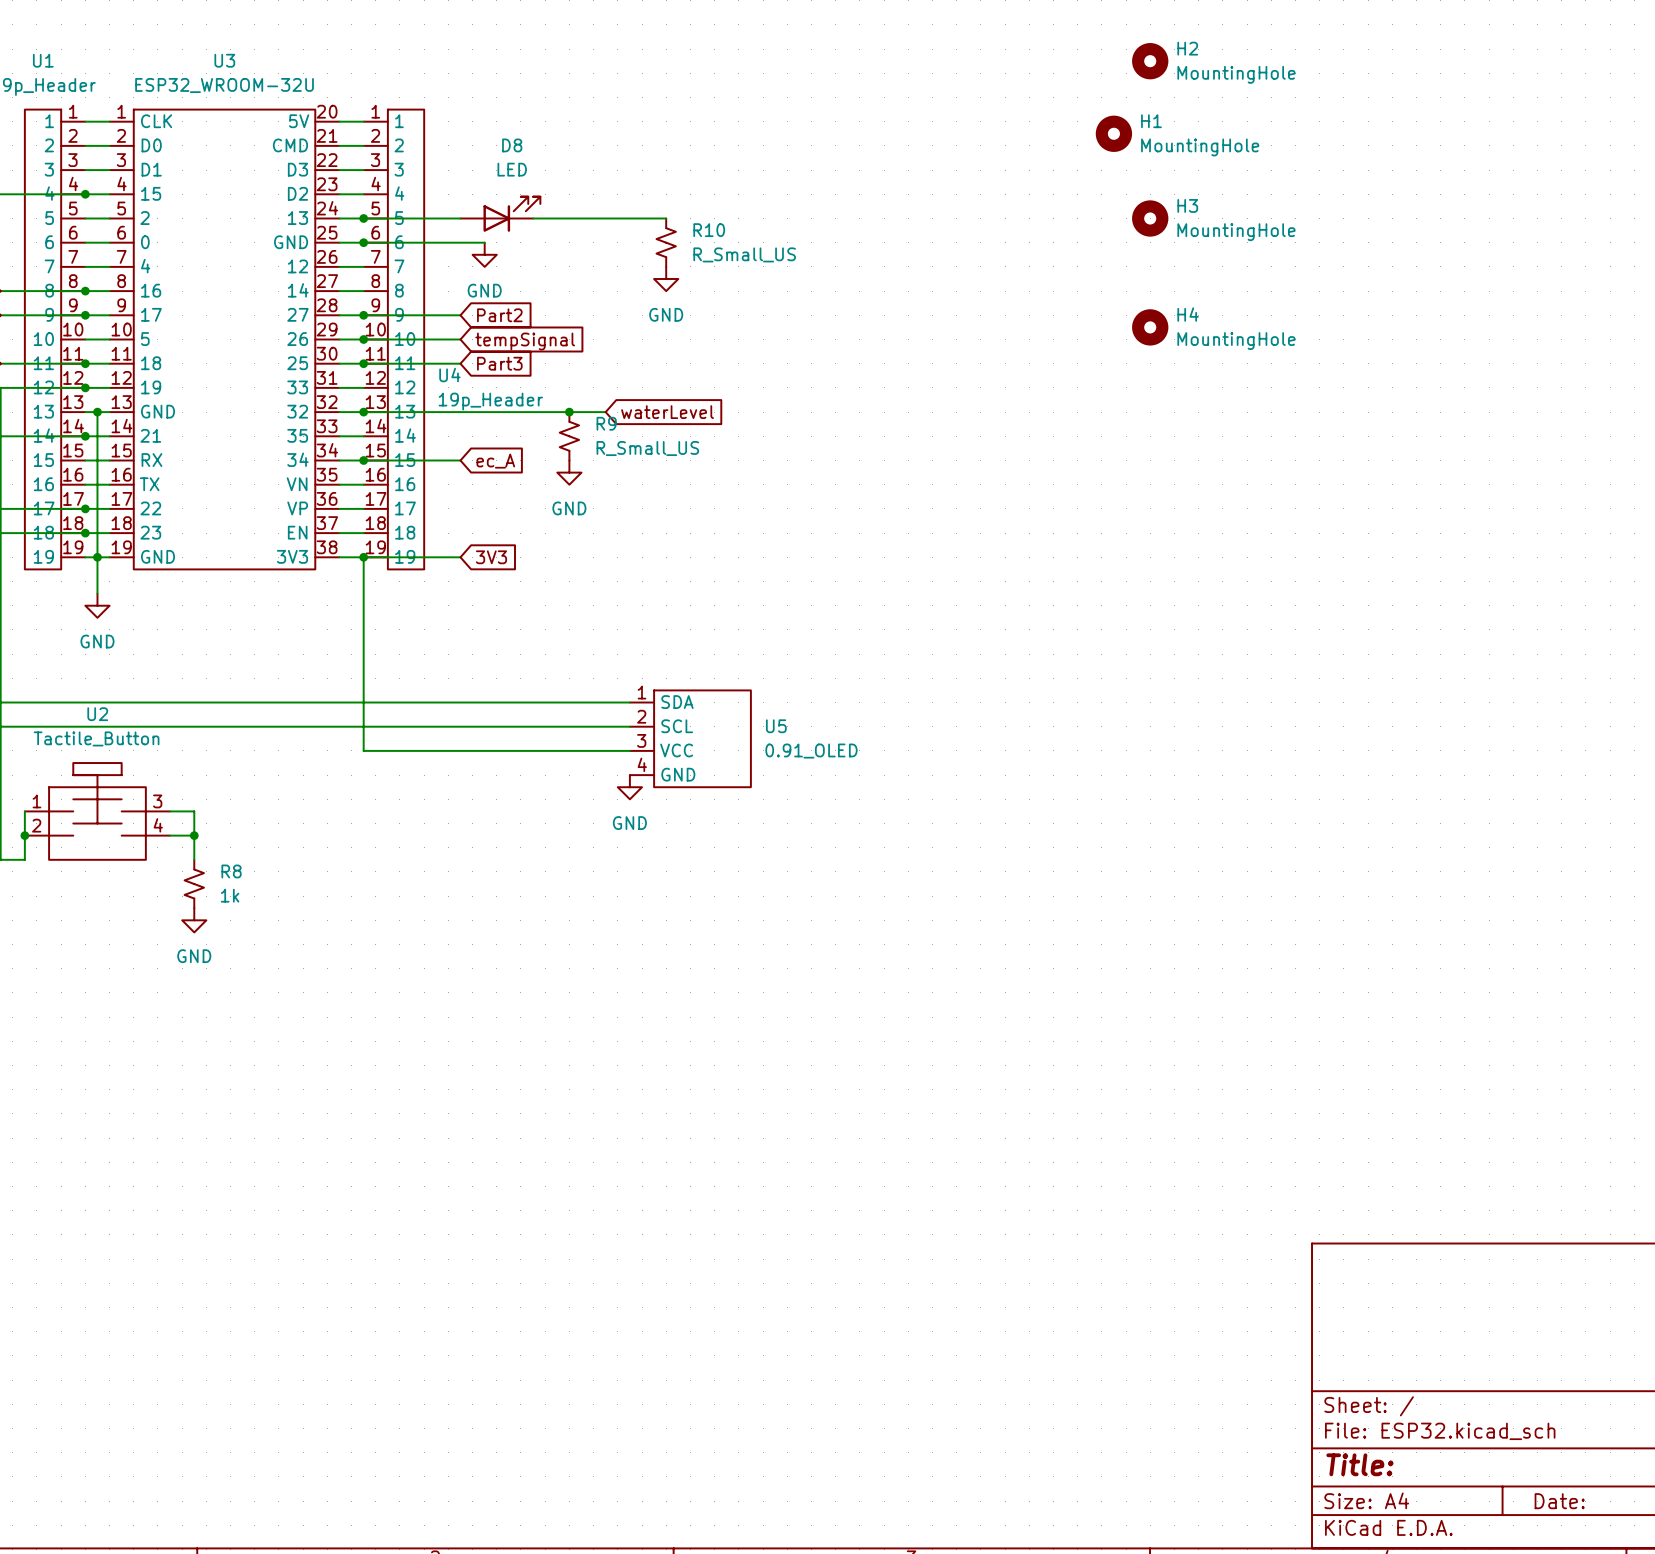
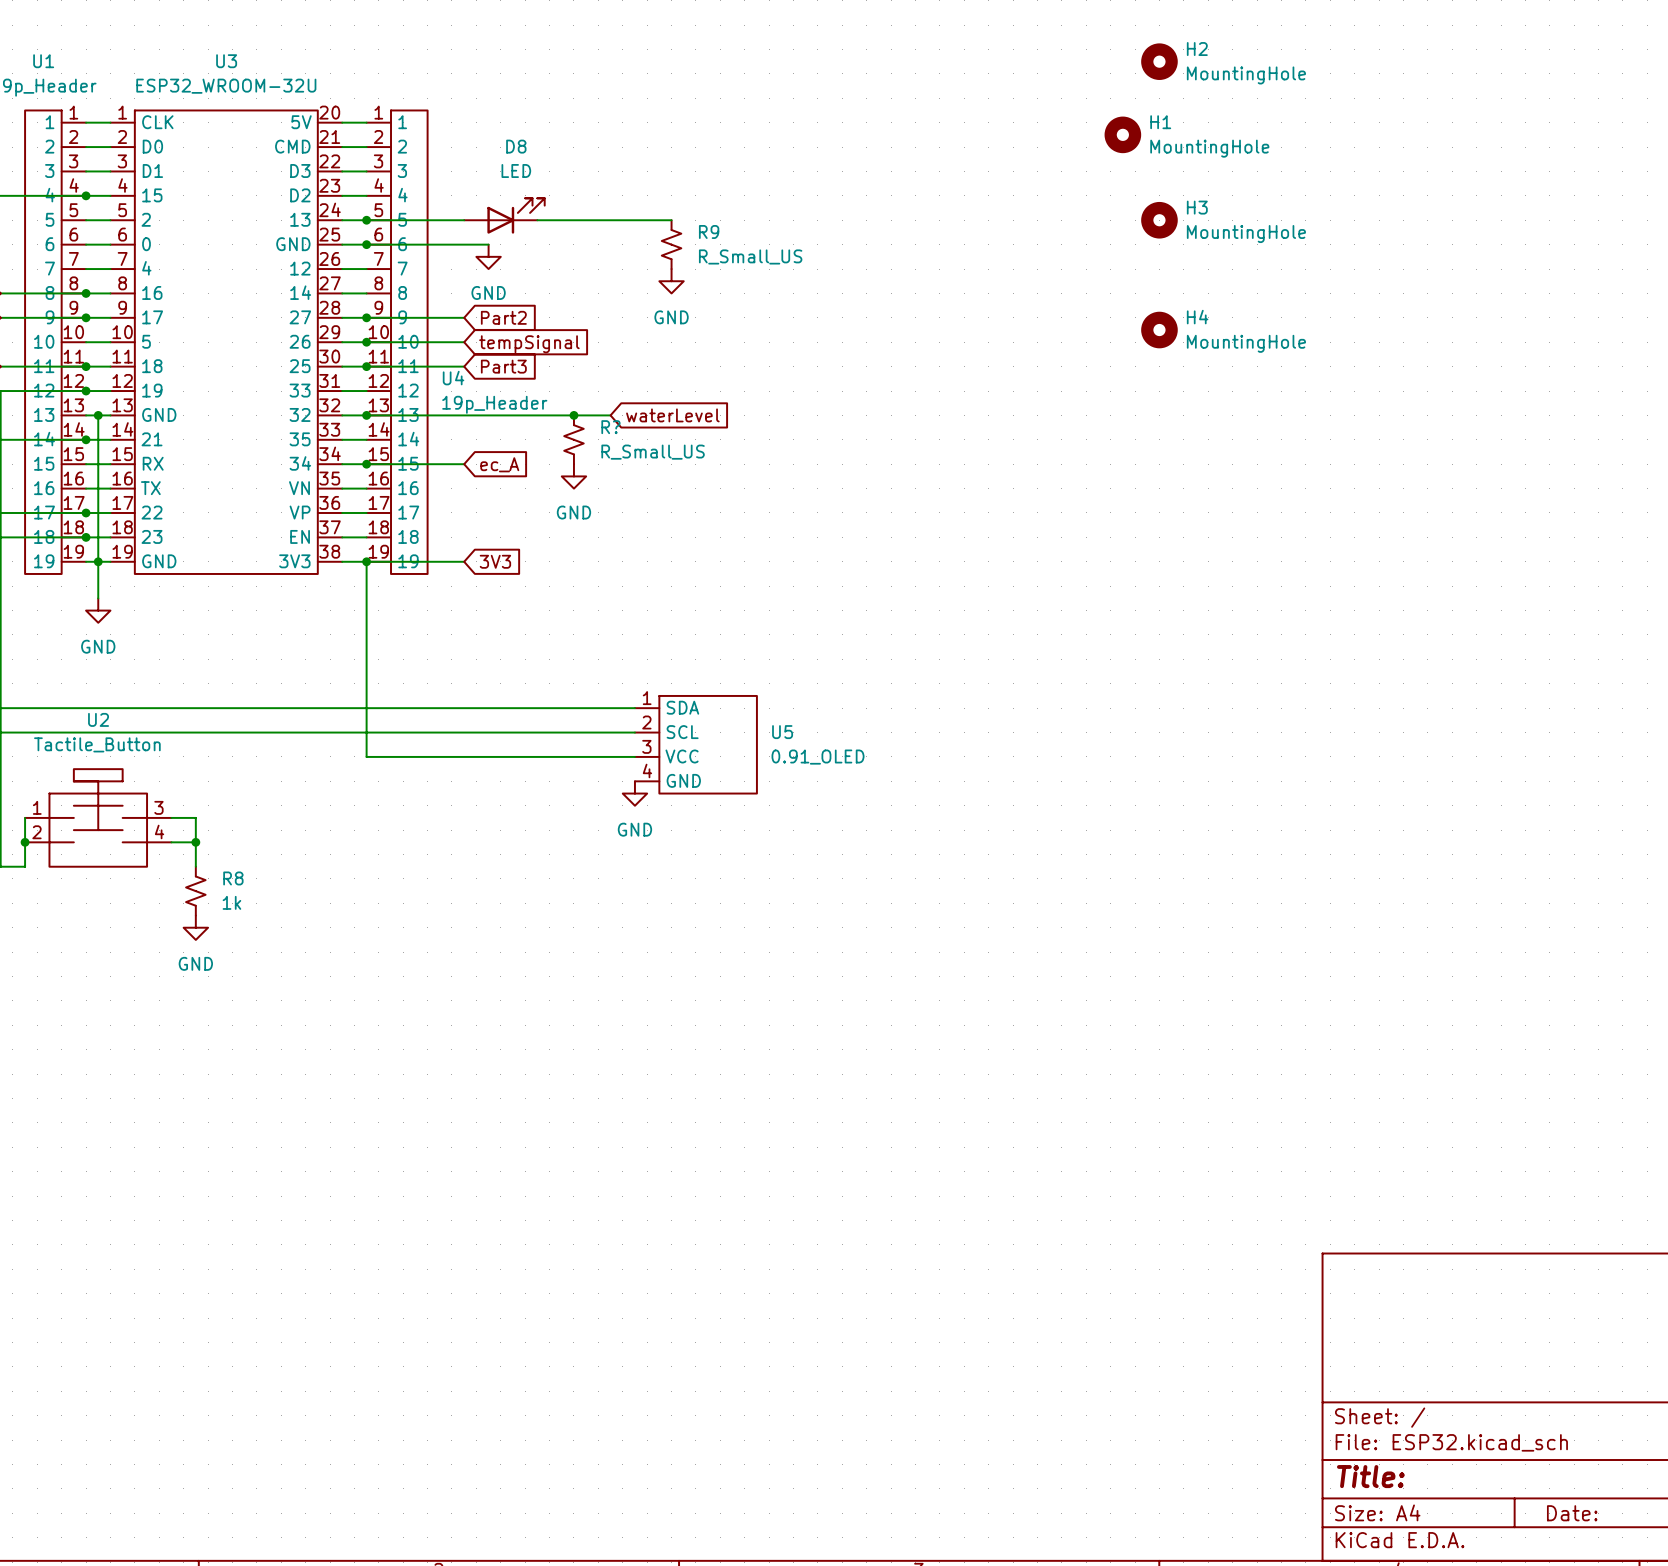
R10 name: R10 (709, 230) -> R9 (709, 231)
R9 name: R9 (606, 423) -> R? (610, 427)

